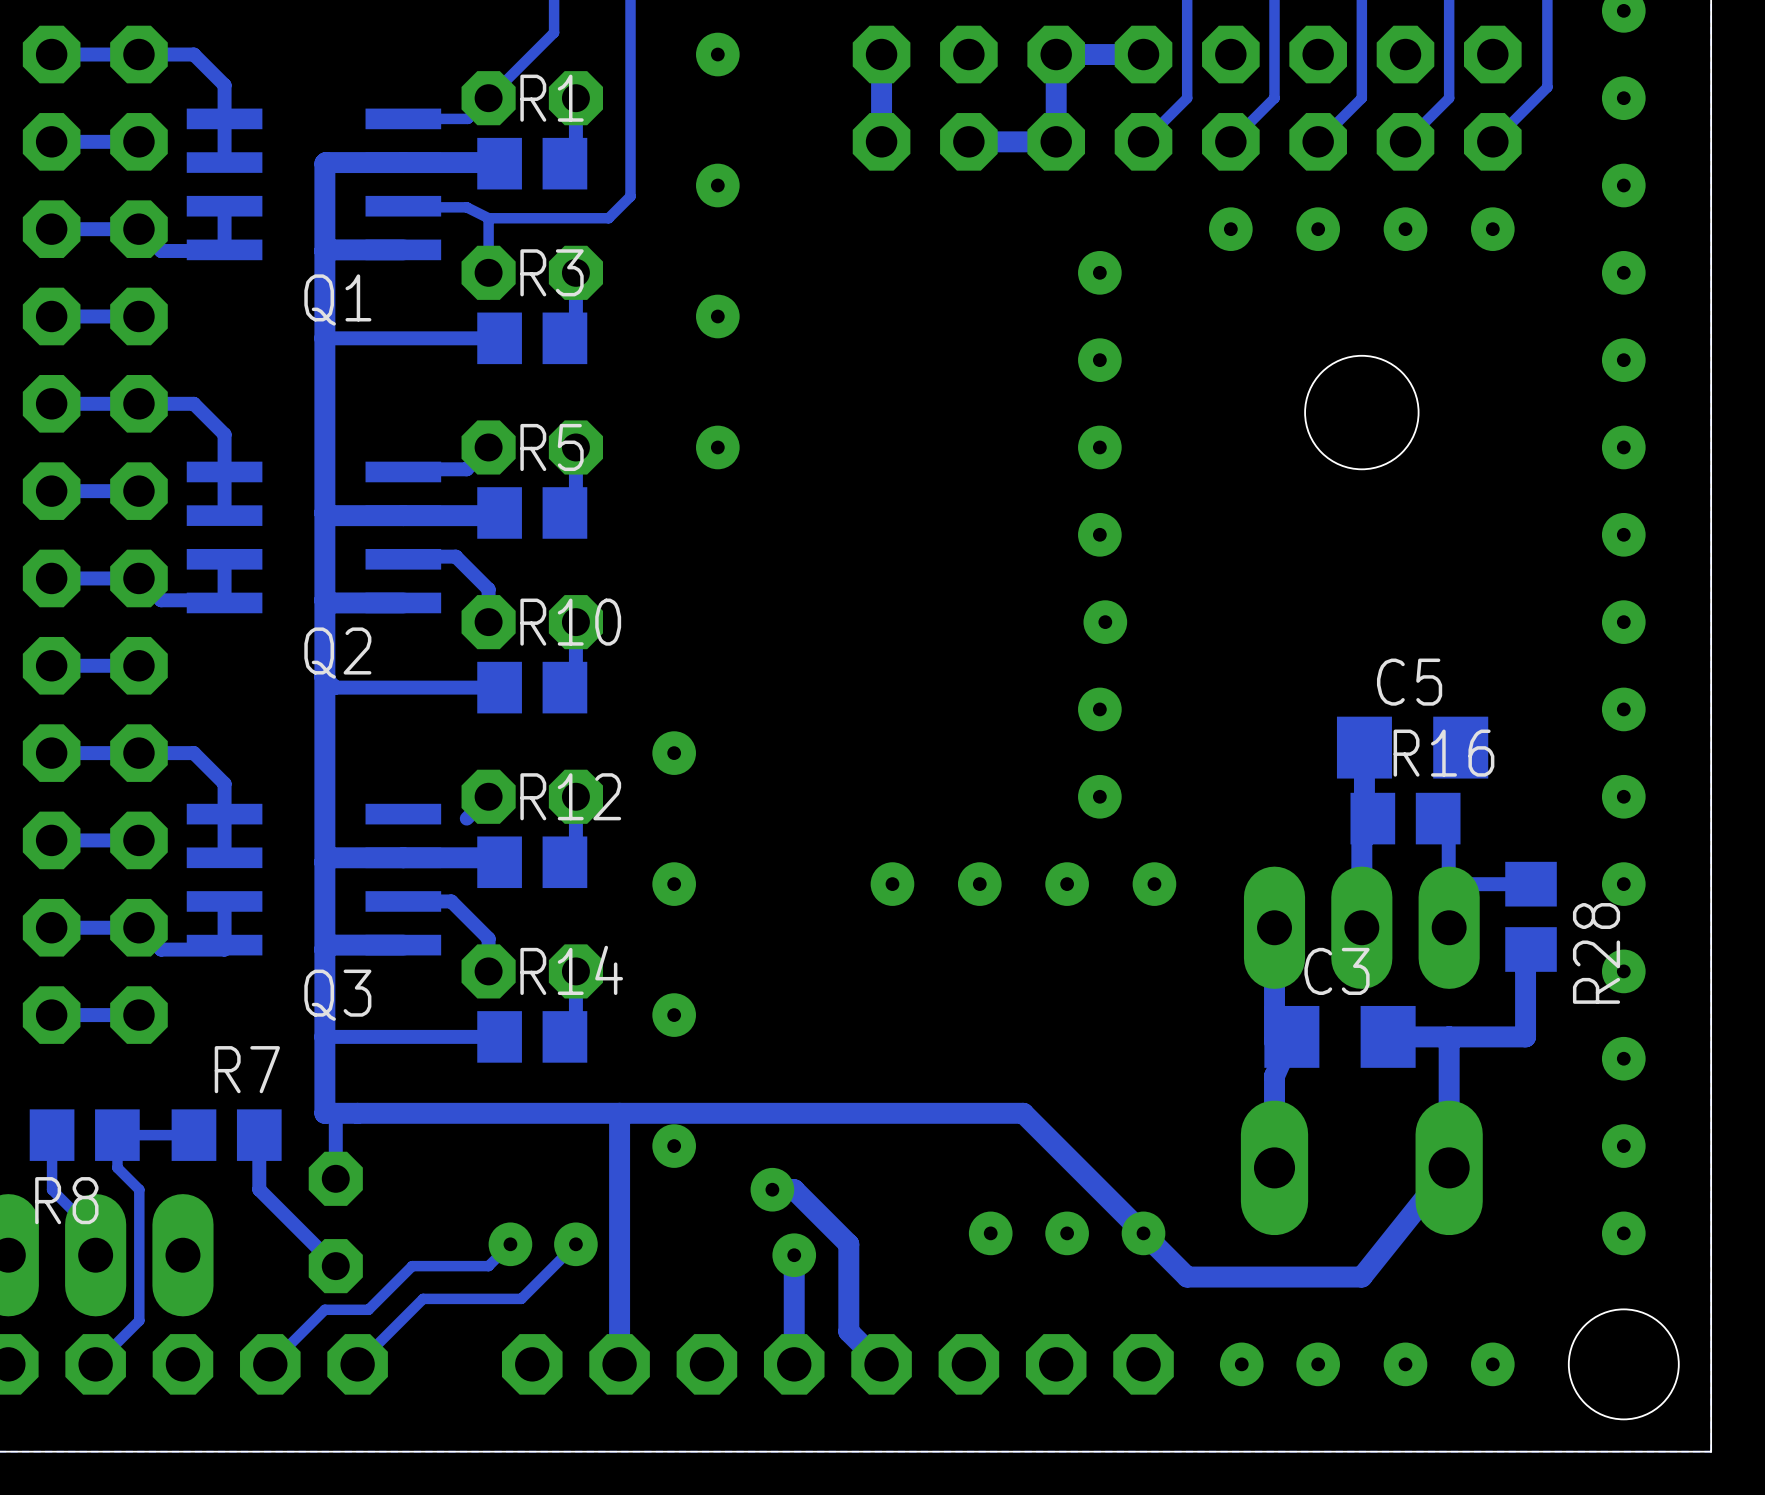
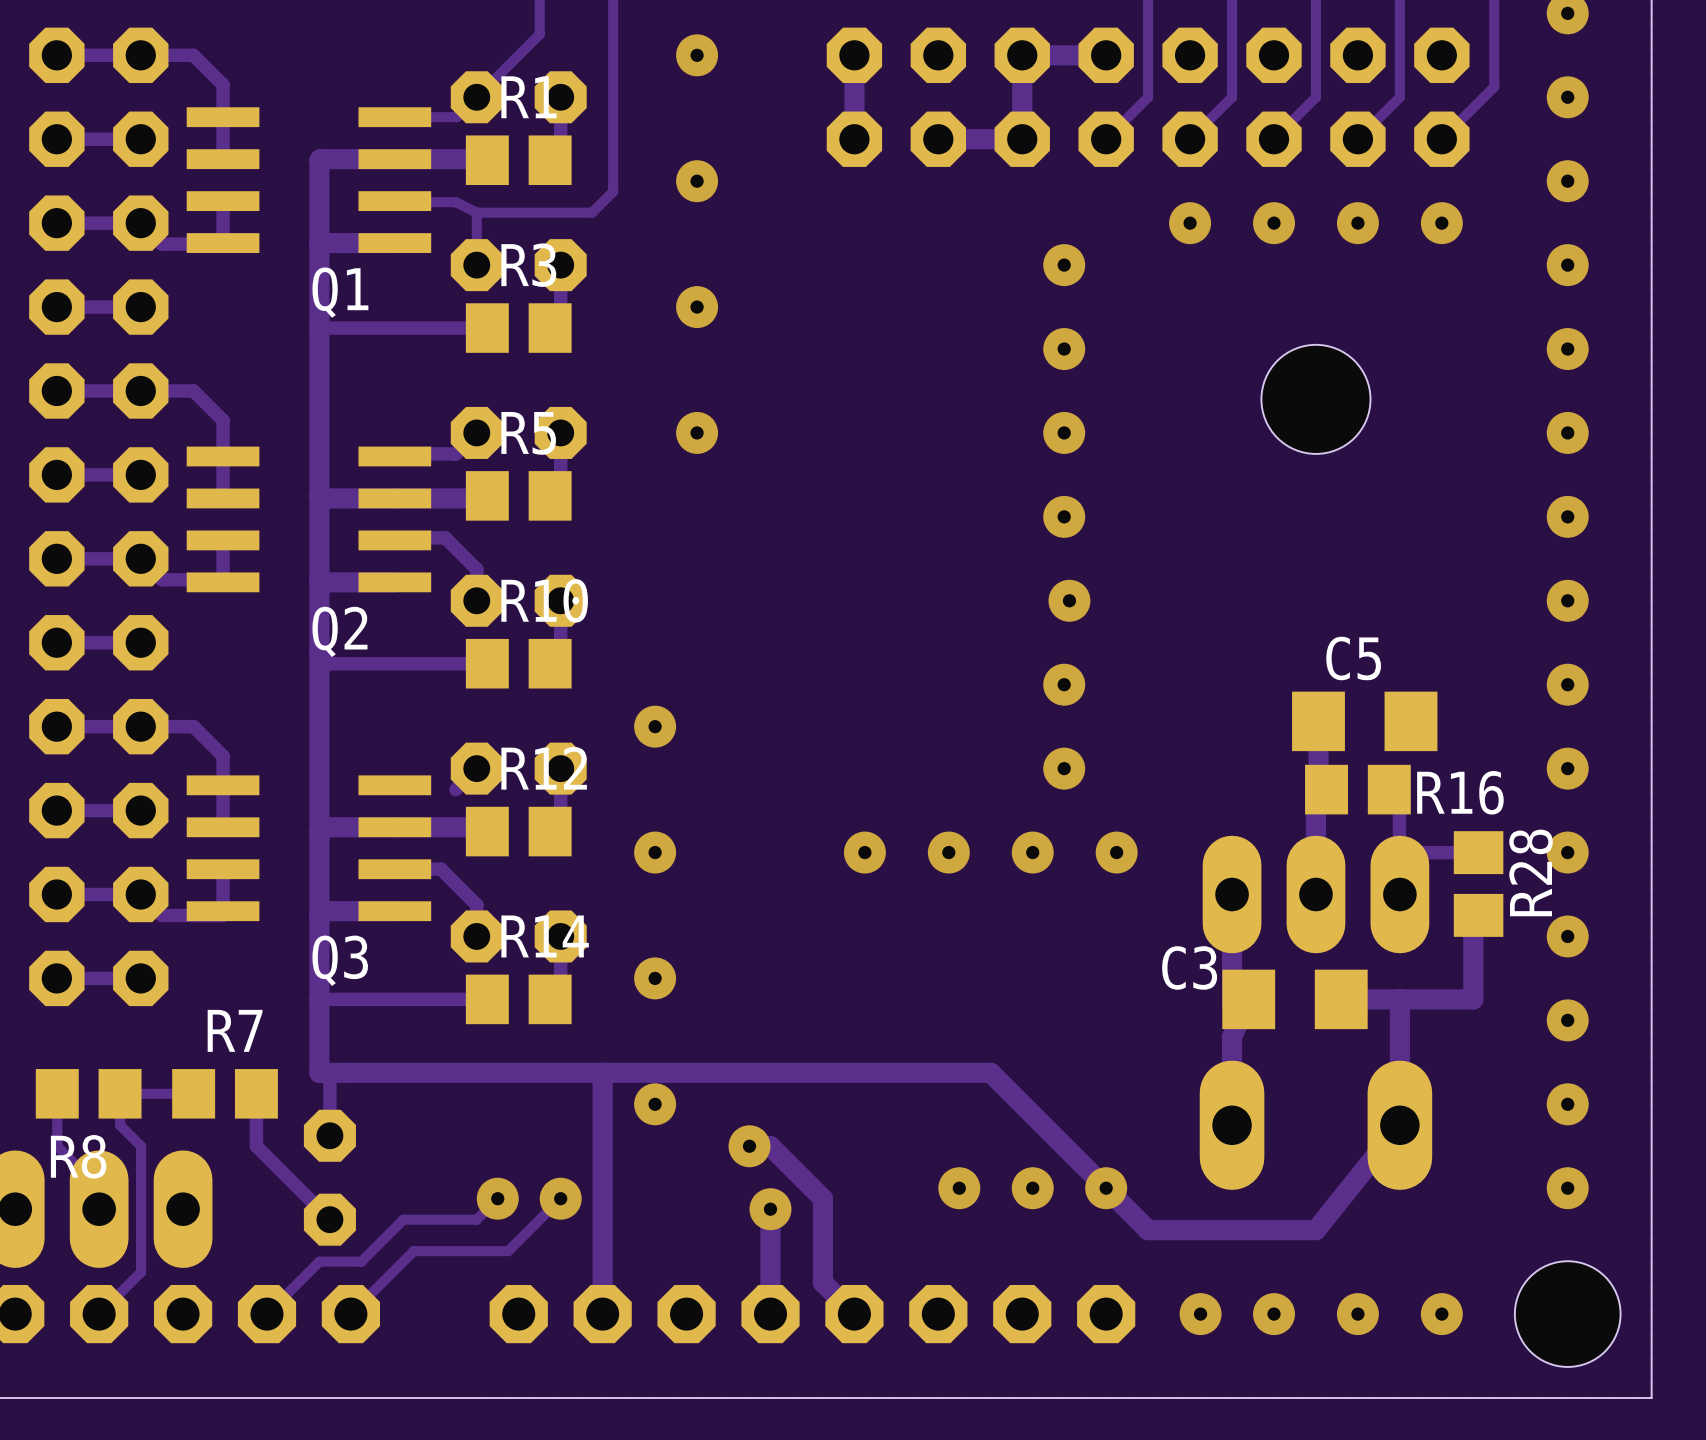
R16 name position: R16 (1443, 753) -> R16 (1460, 792)
R28 name position: R28 (1596, 953) -> R28 (1531, 872)
C3 name position: C3 (1337, 971) -> C3 (1189, 967)

